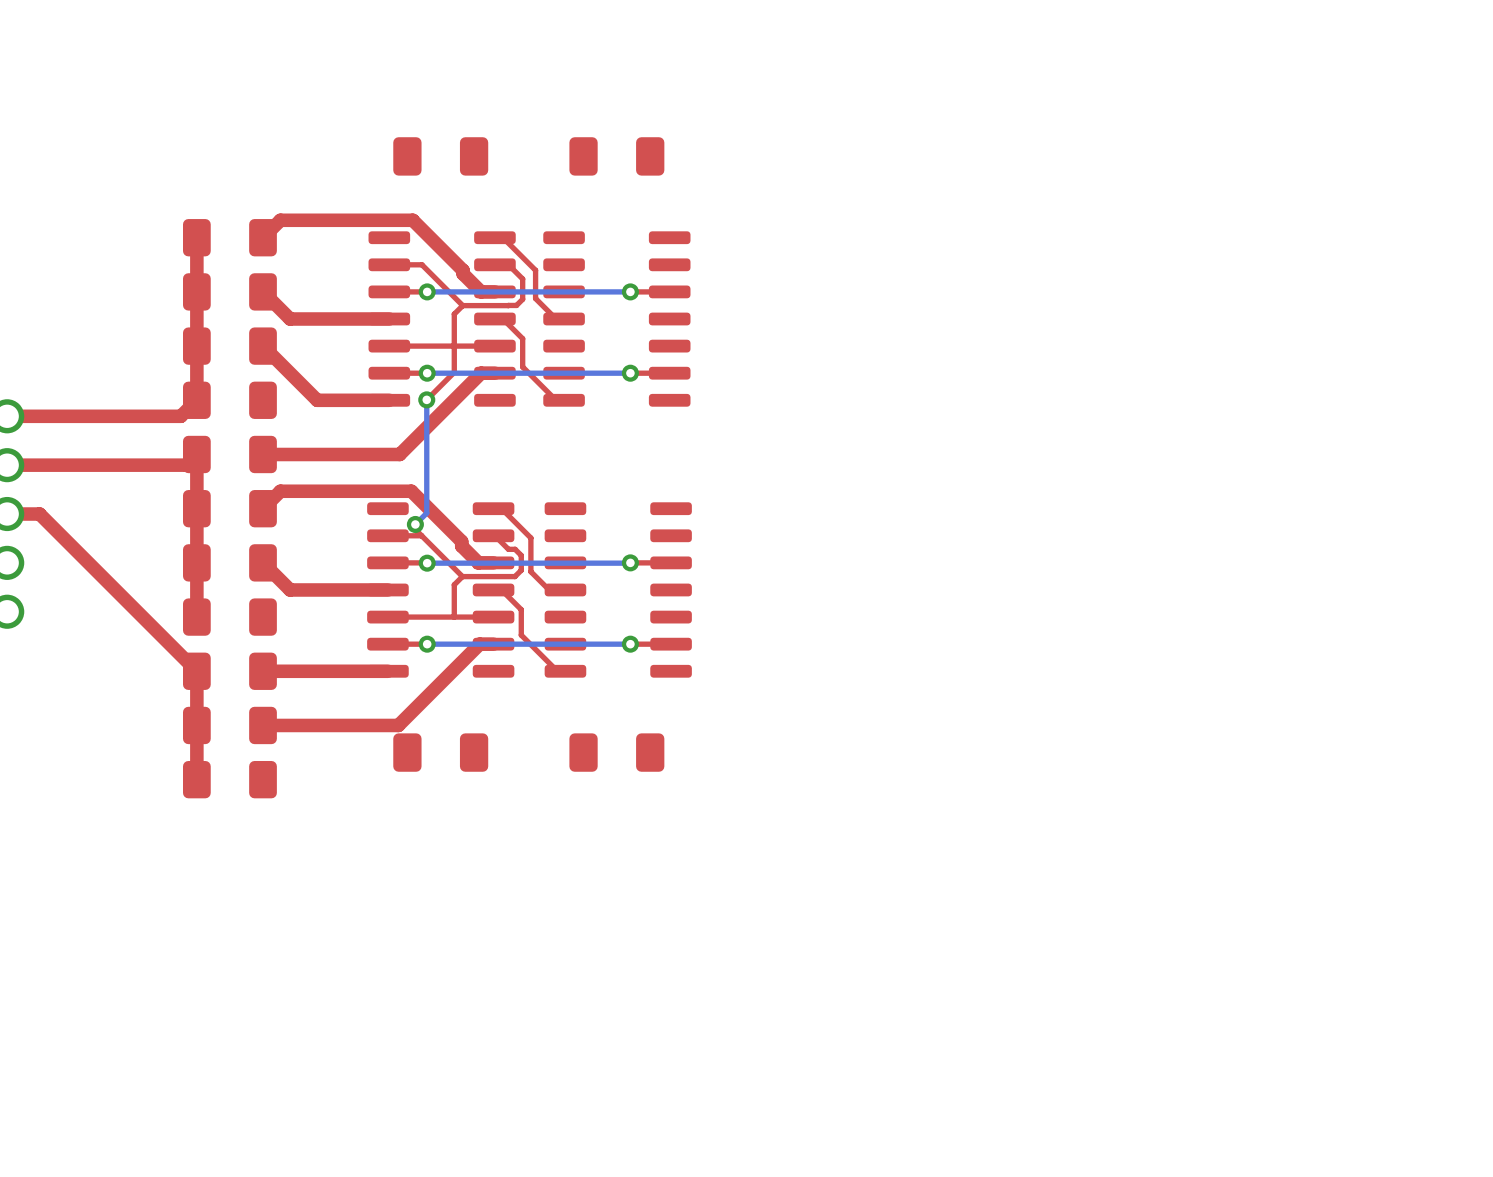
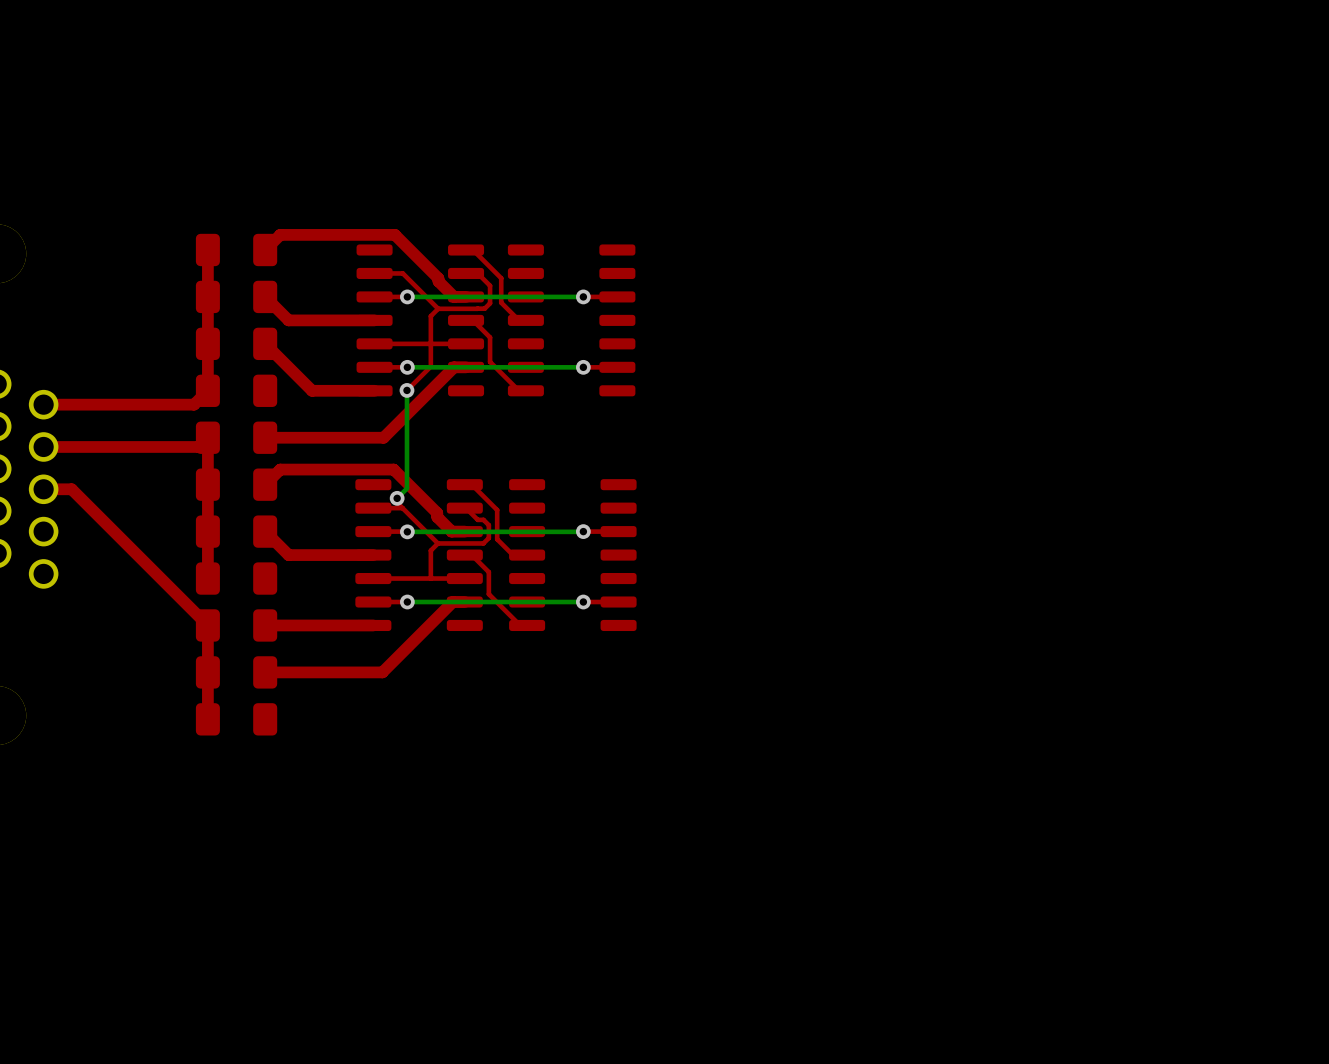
part: (440, 156) -> none
part: (616, 156) -> none
part: (440, 752) -> none
part: (616, 752) -> none

